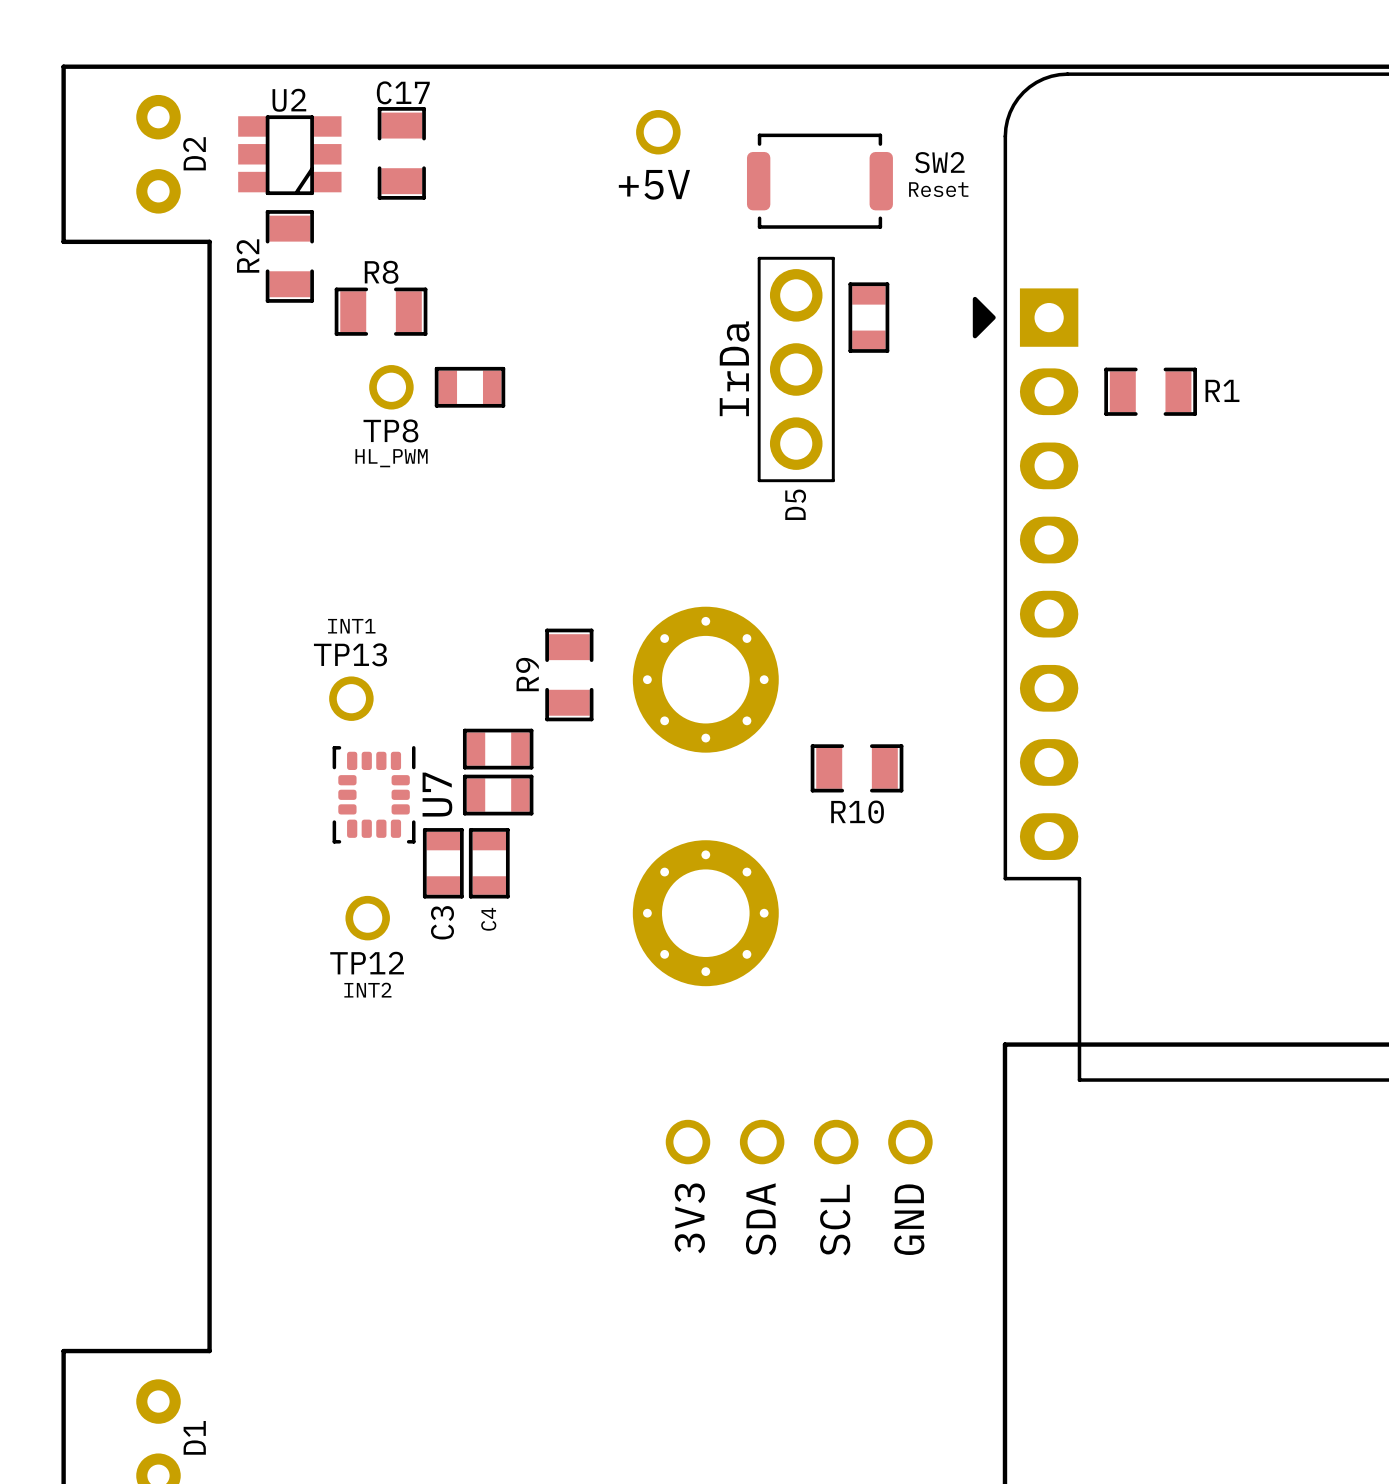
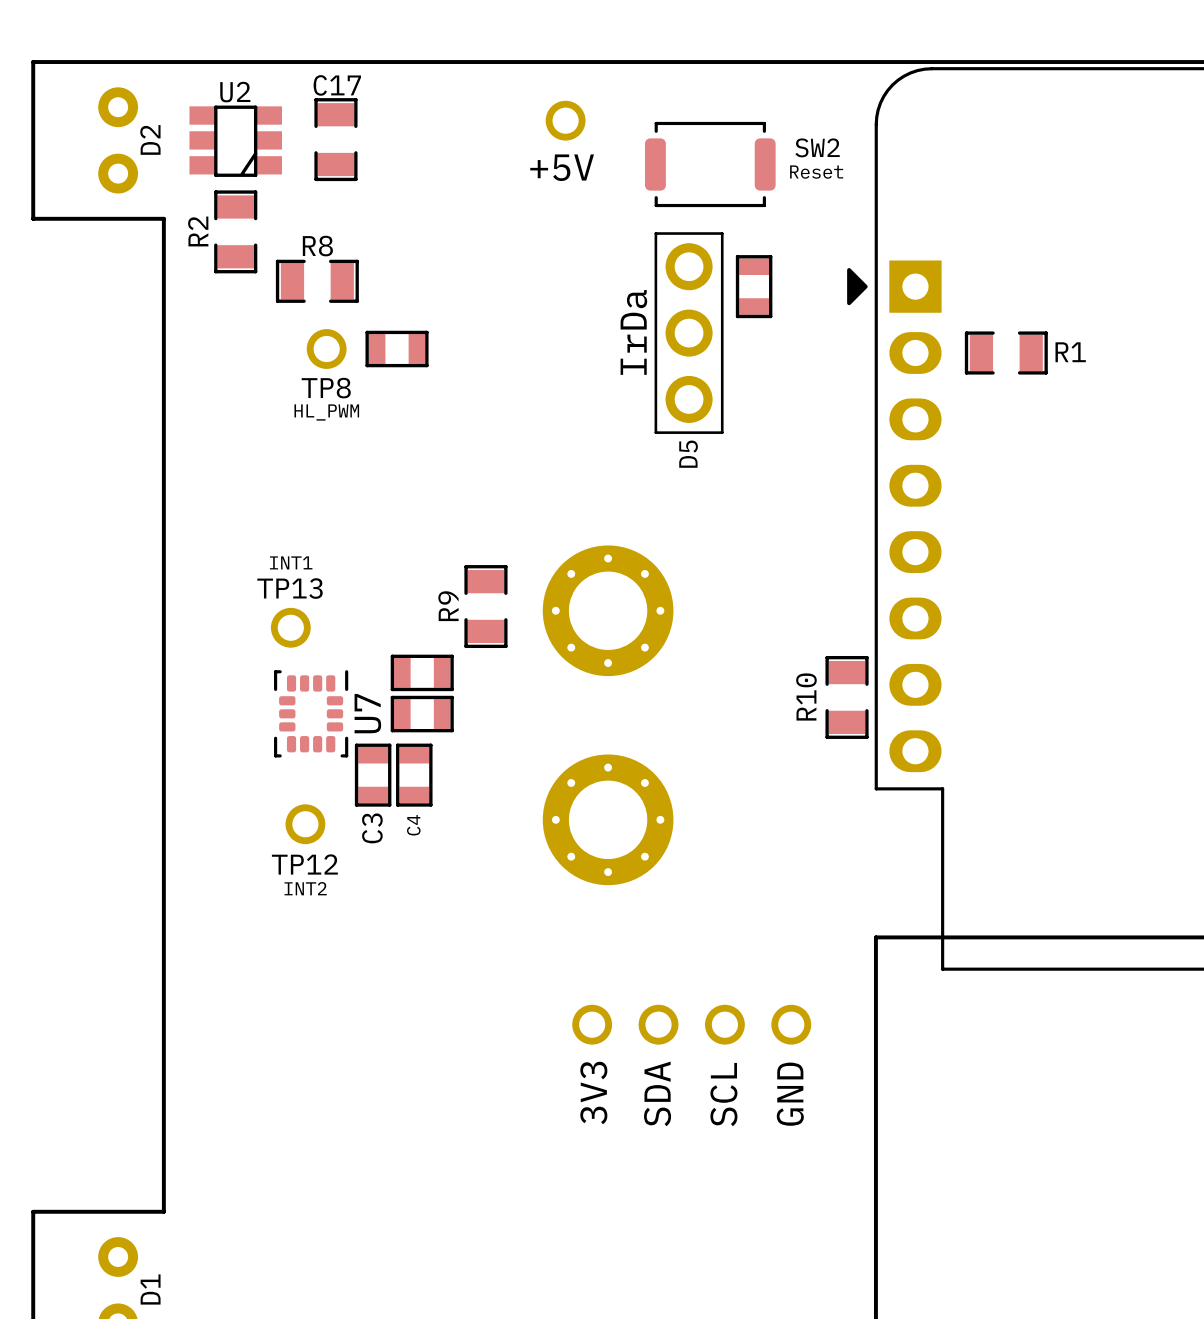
R10 rotation: 0° (857, 768) -> 90° clockwise (847, 697)
R10 position: (857, 768) -> (847, 697)

